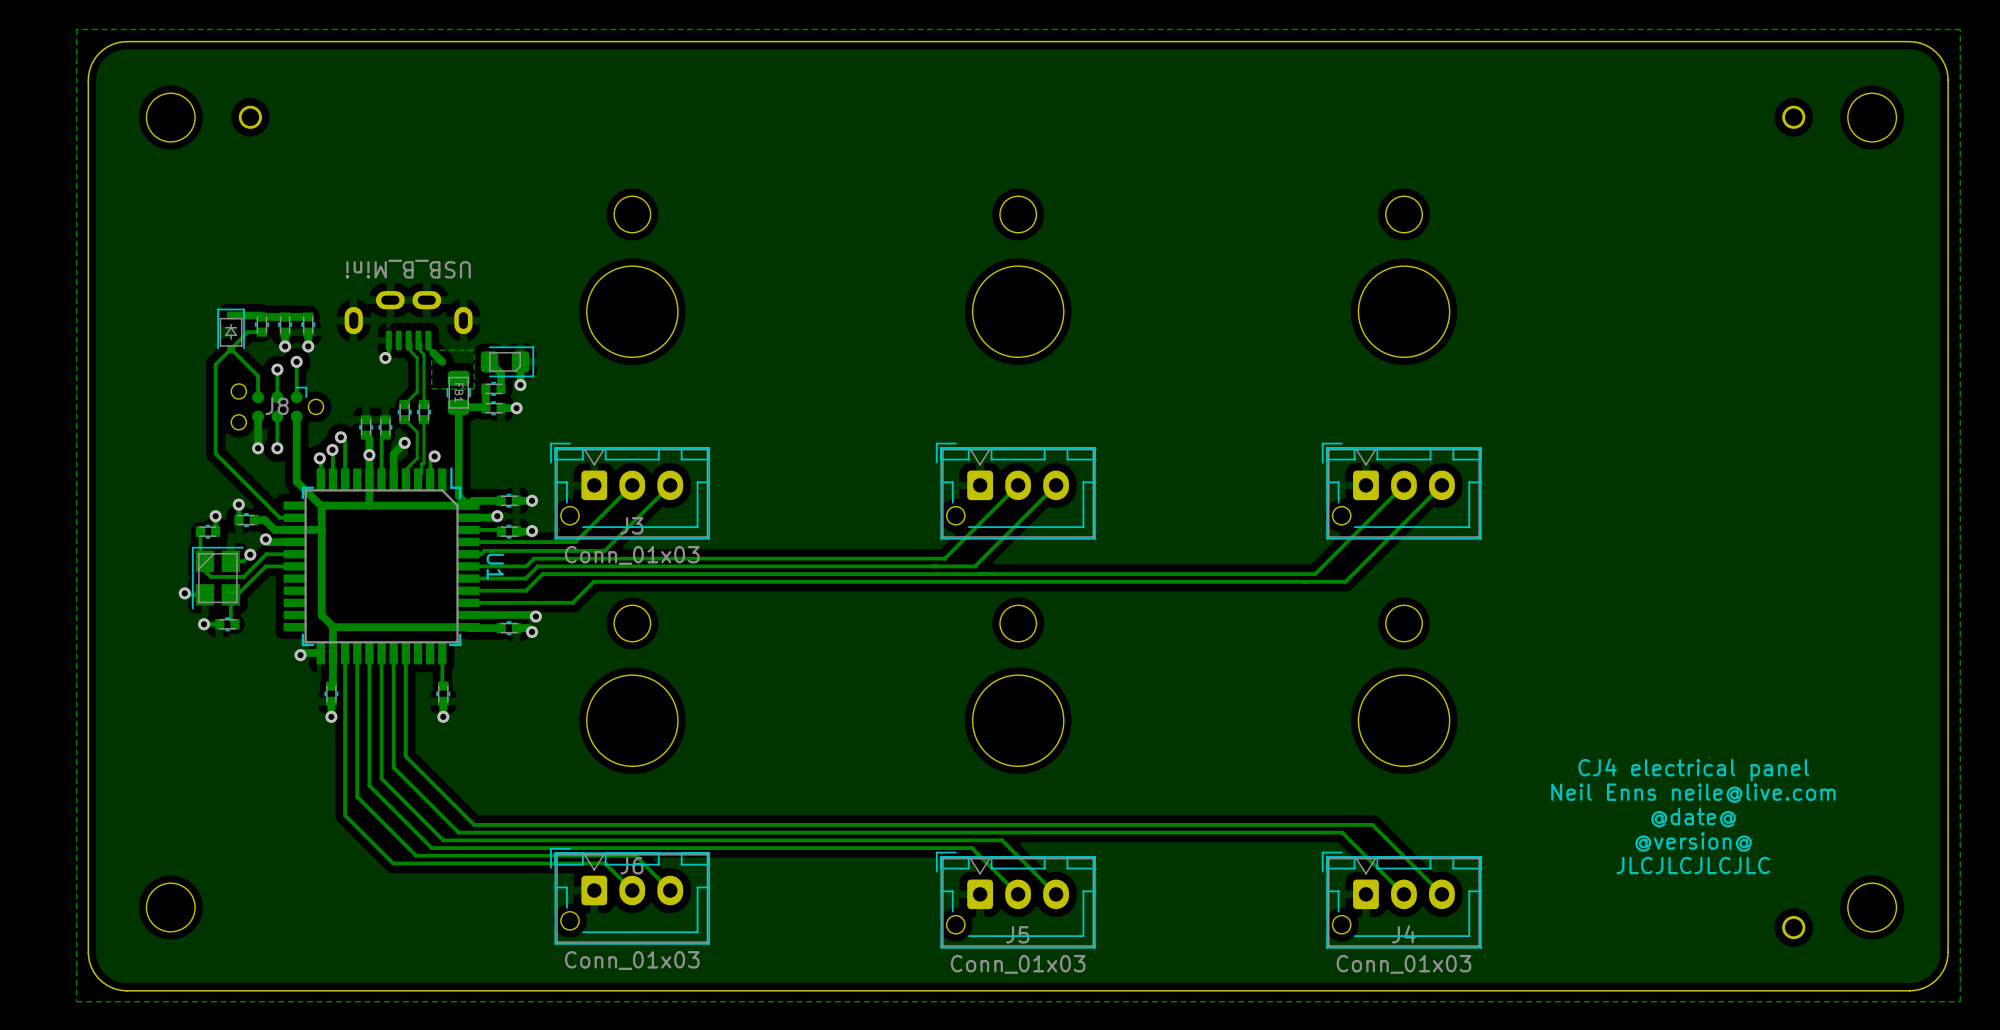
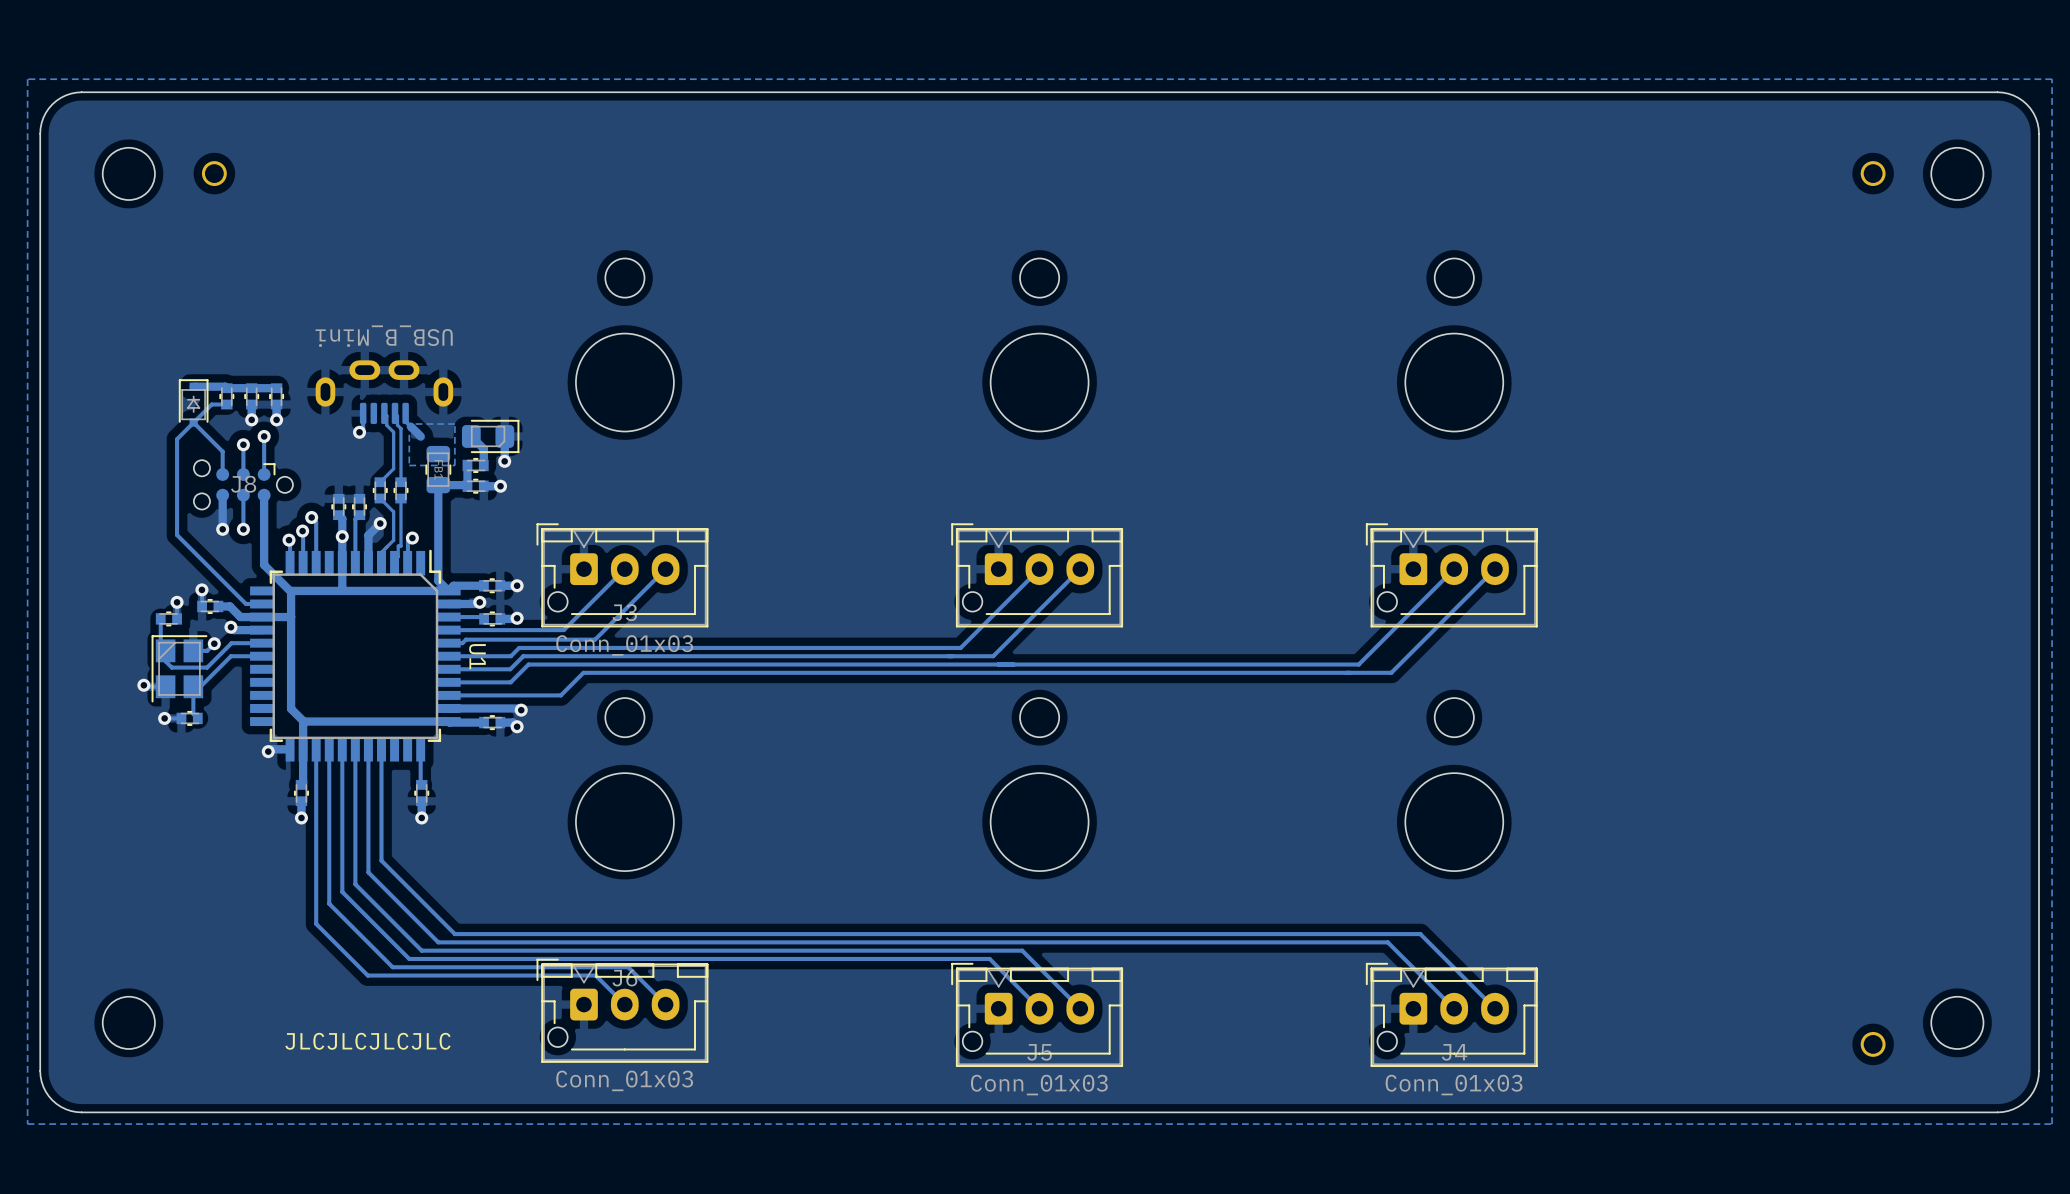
text: CJ4 electrical panel (1693, 769) -> none
text: Neil Enns neile@live.com (1693, 793) -> none
text: @date@ (1693, 817) -> none
text: @version@ (1693, 842) -> none
text: JLCJLCJLCJLC (1693, 865) -> none
text: none -> JLCJLCJLCJLC (367, 1041)

